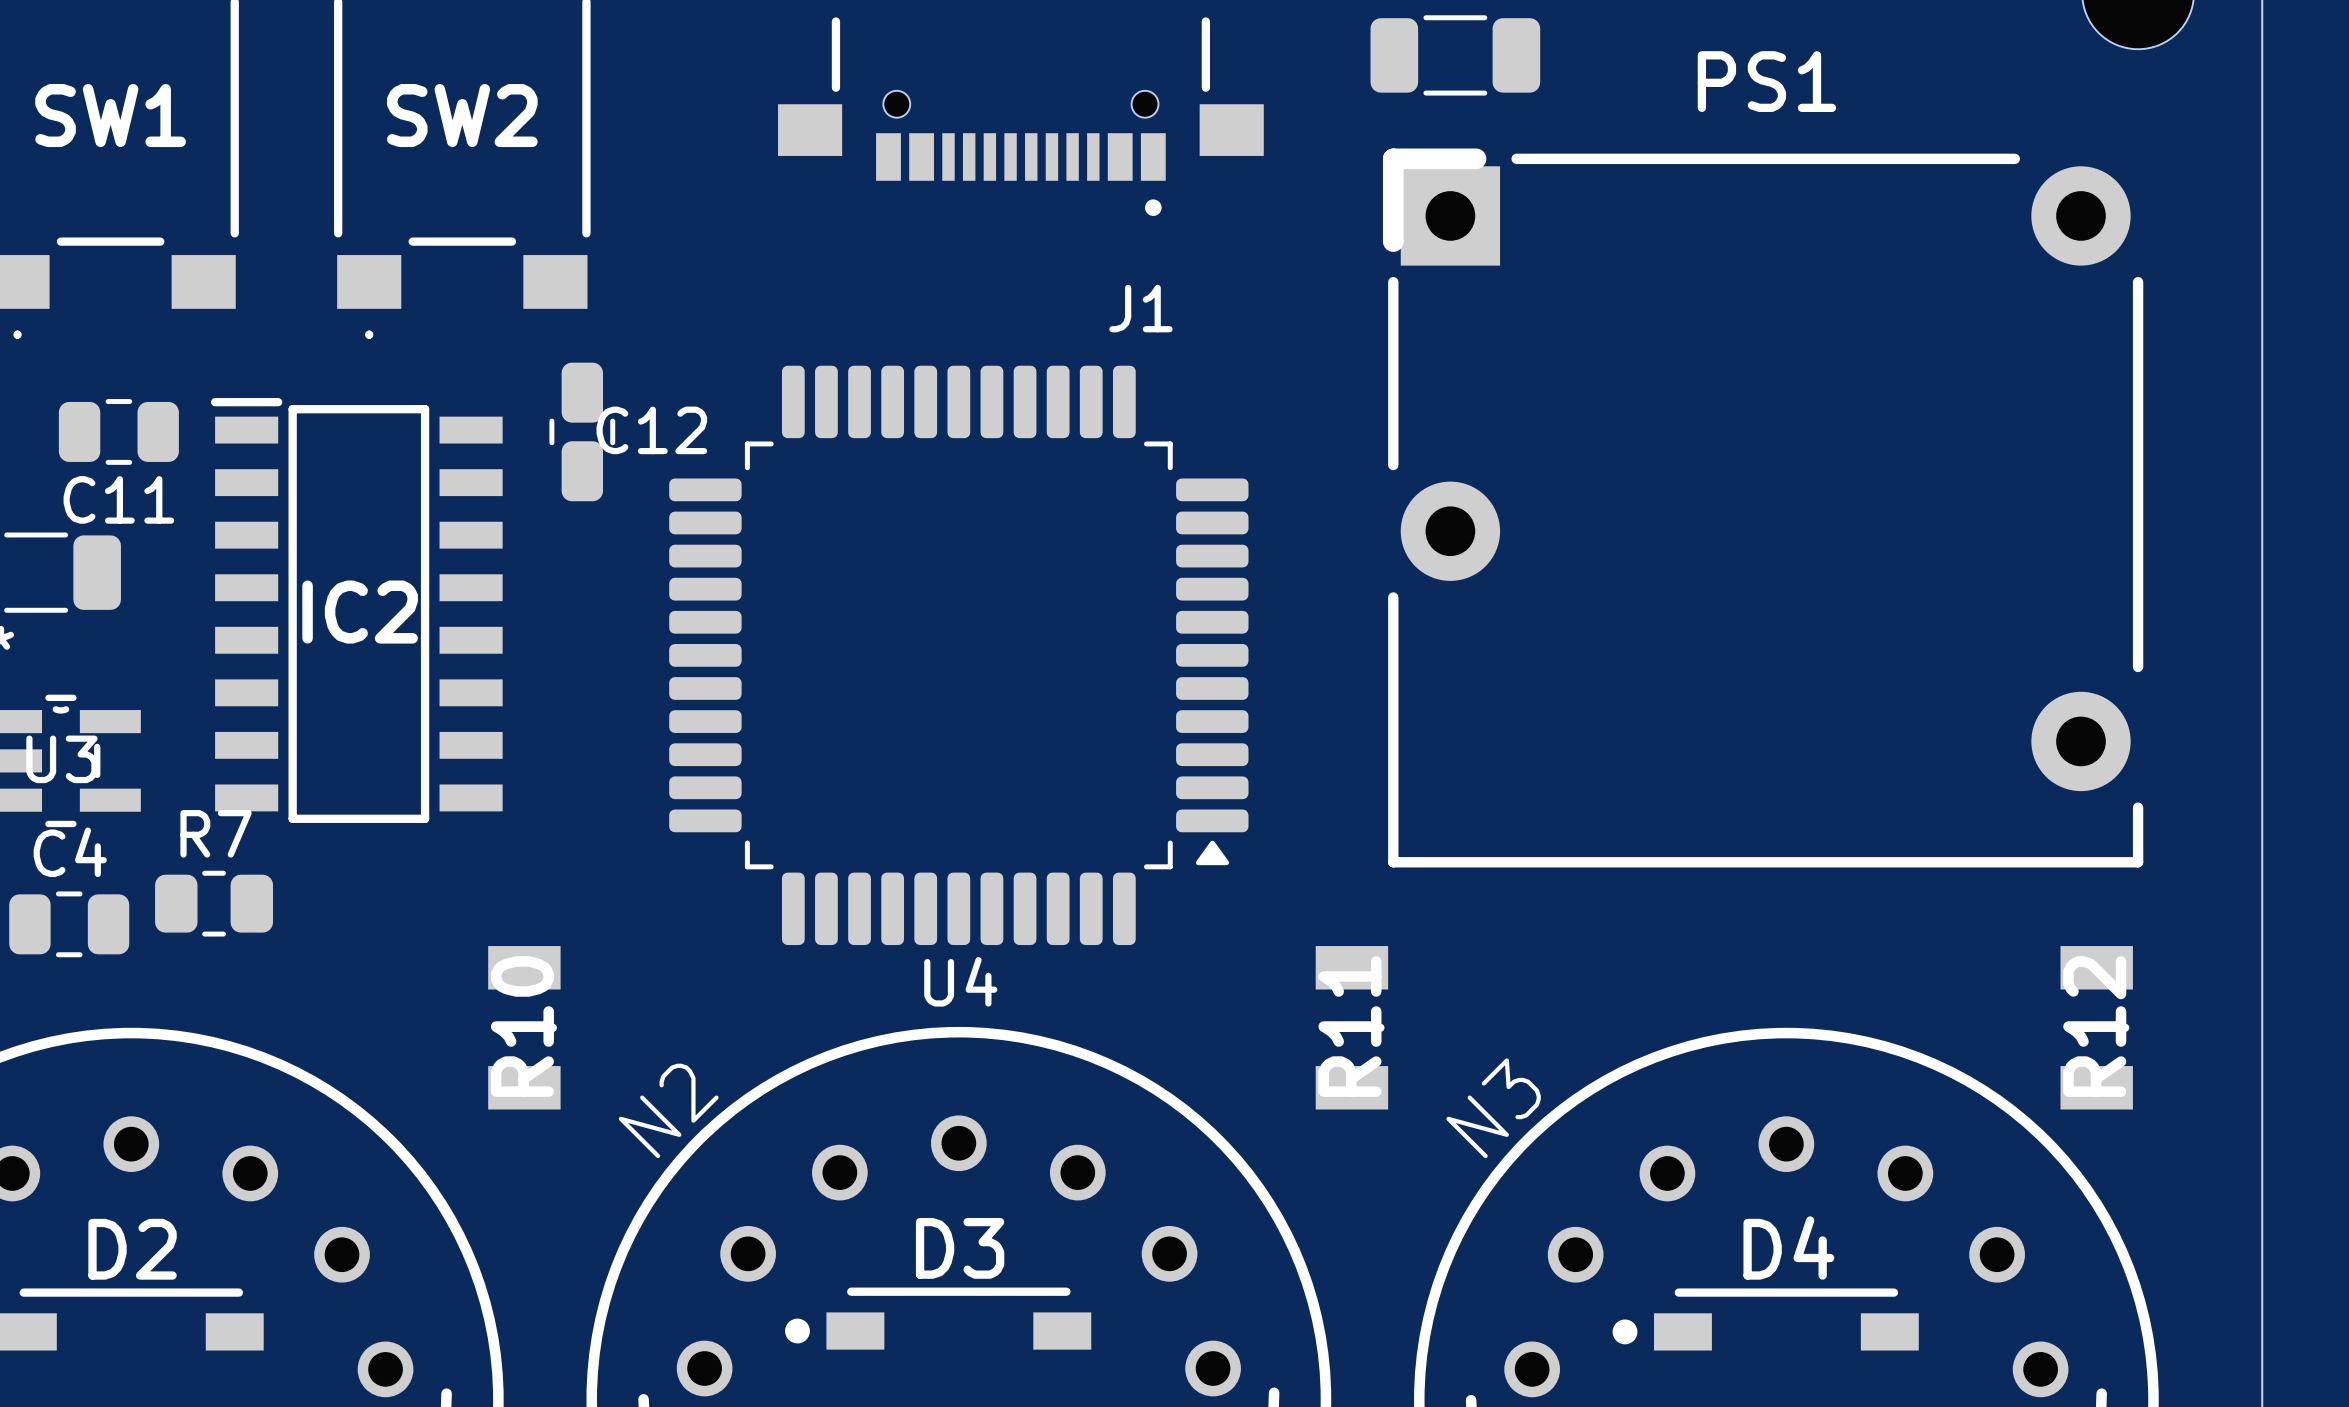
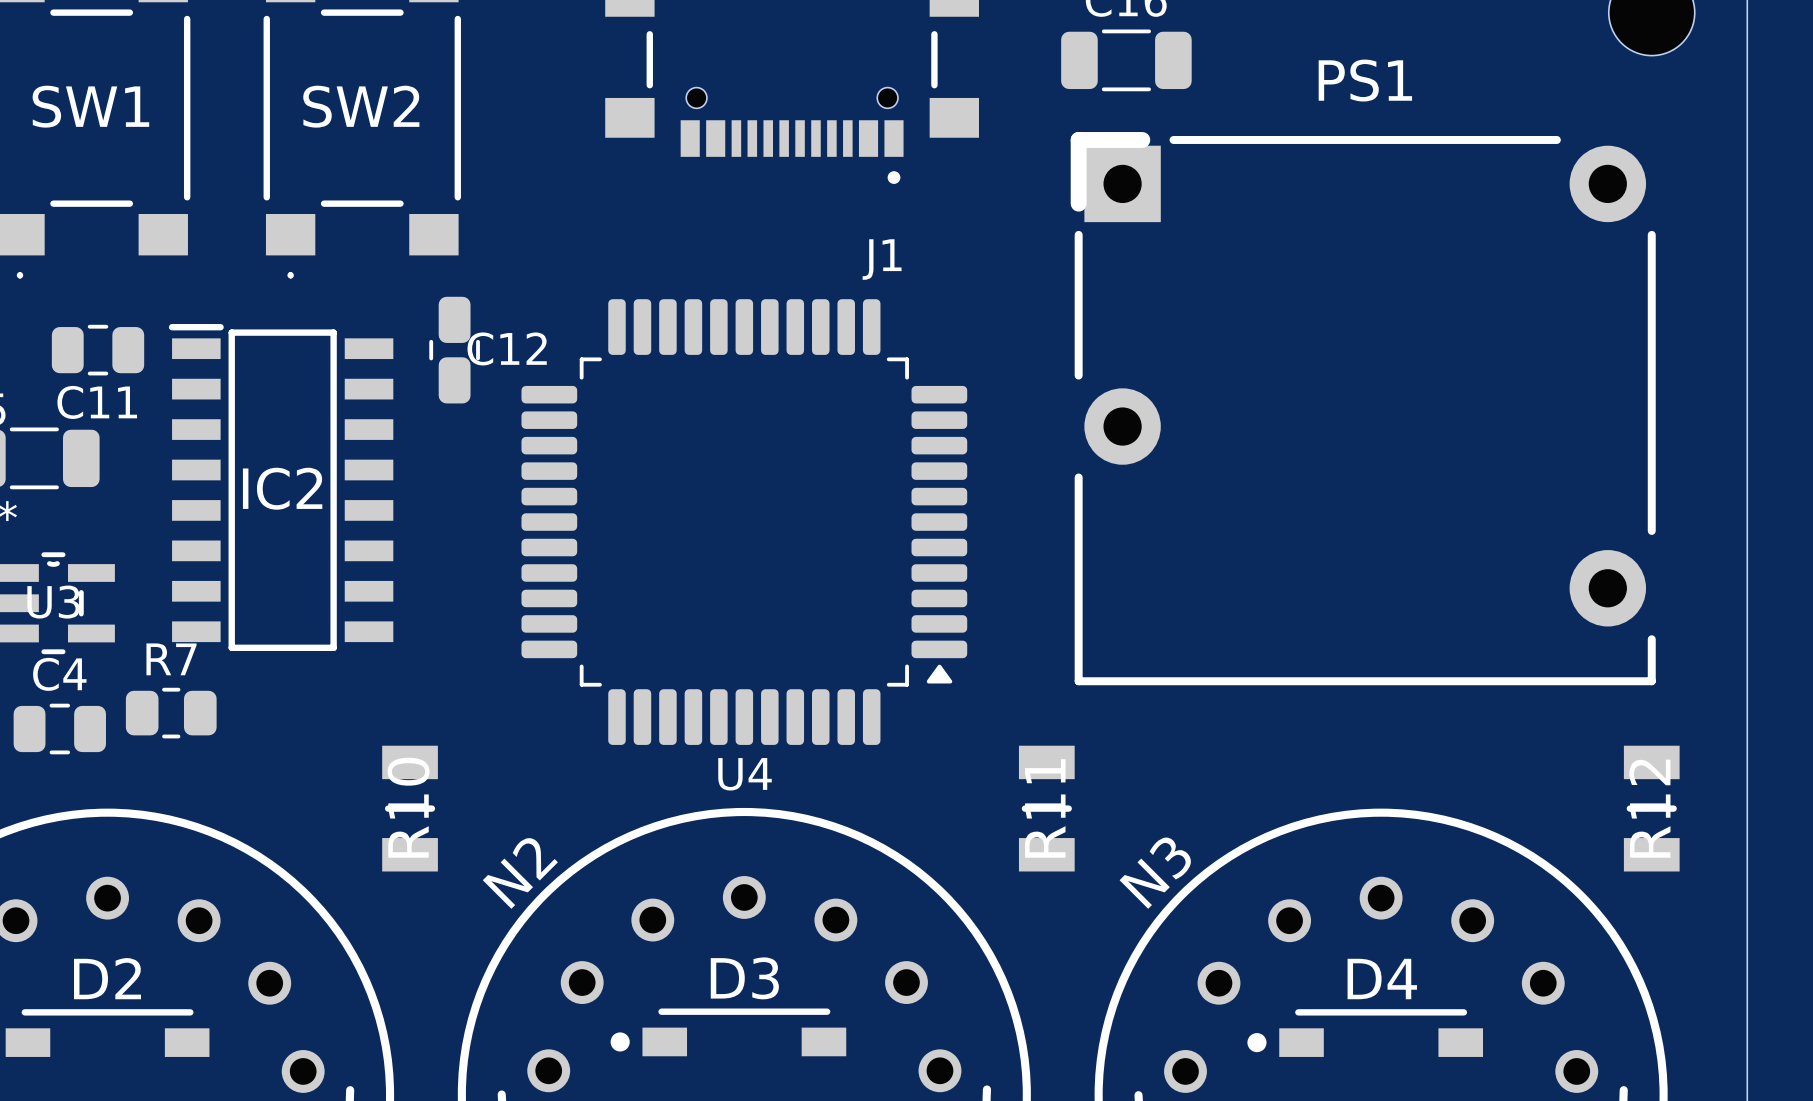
part position: (2096, 1027) -> (1651, 808)

